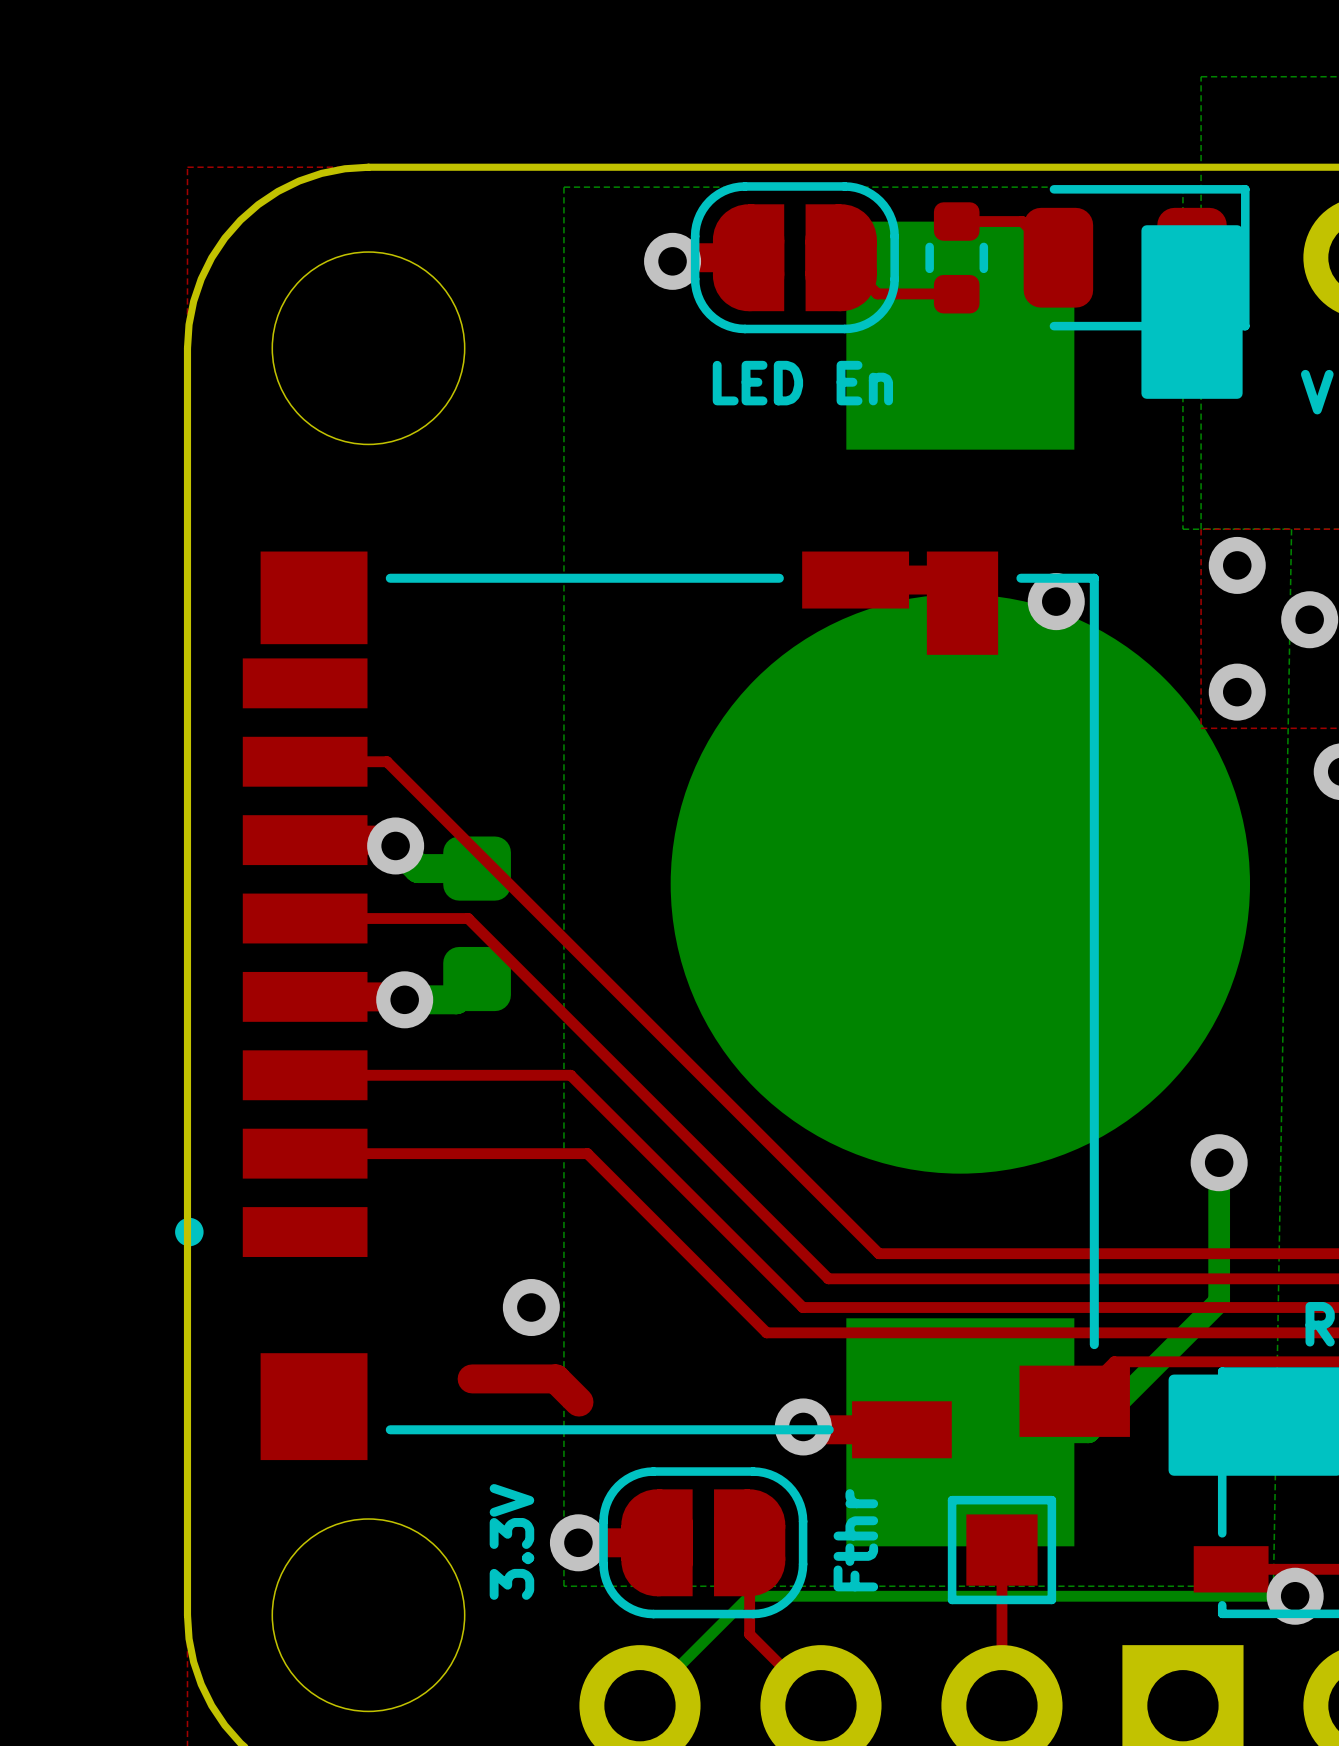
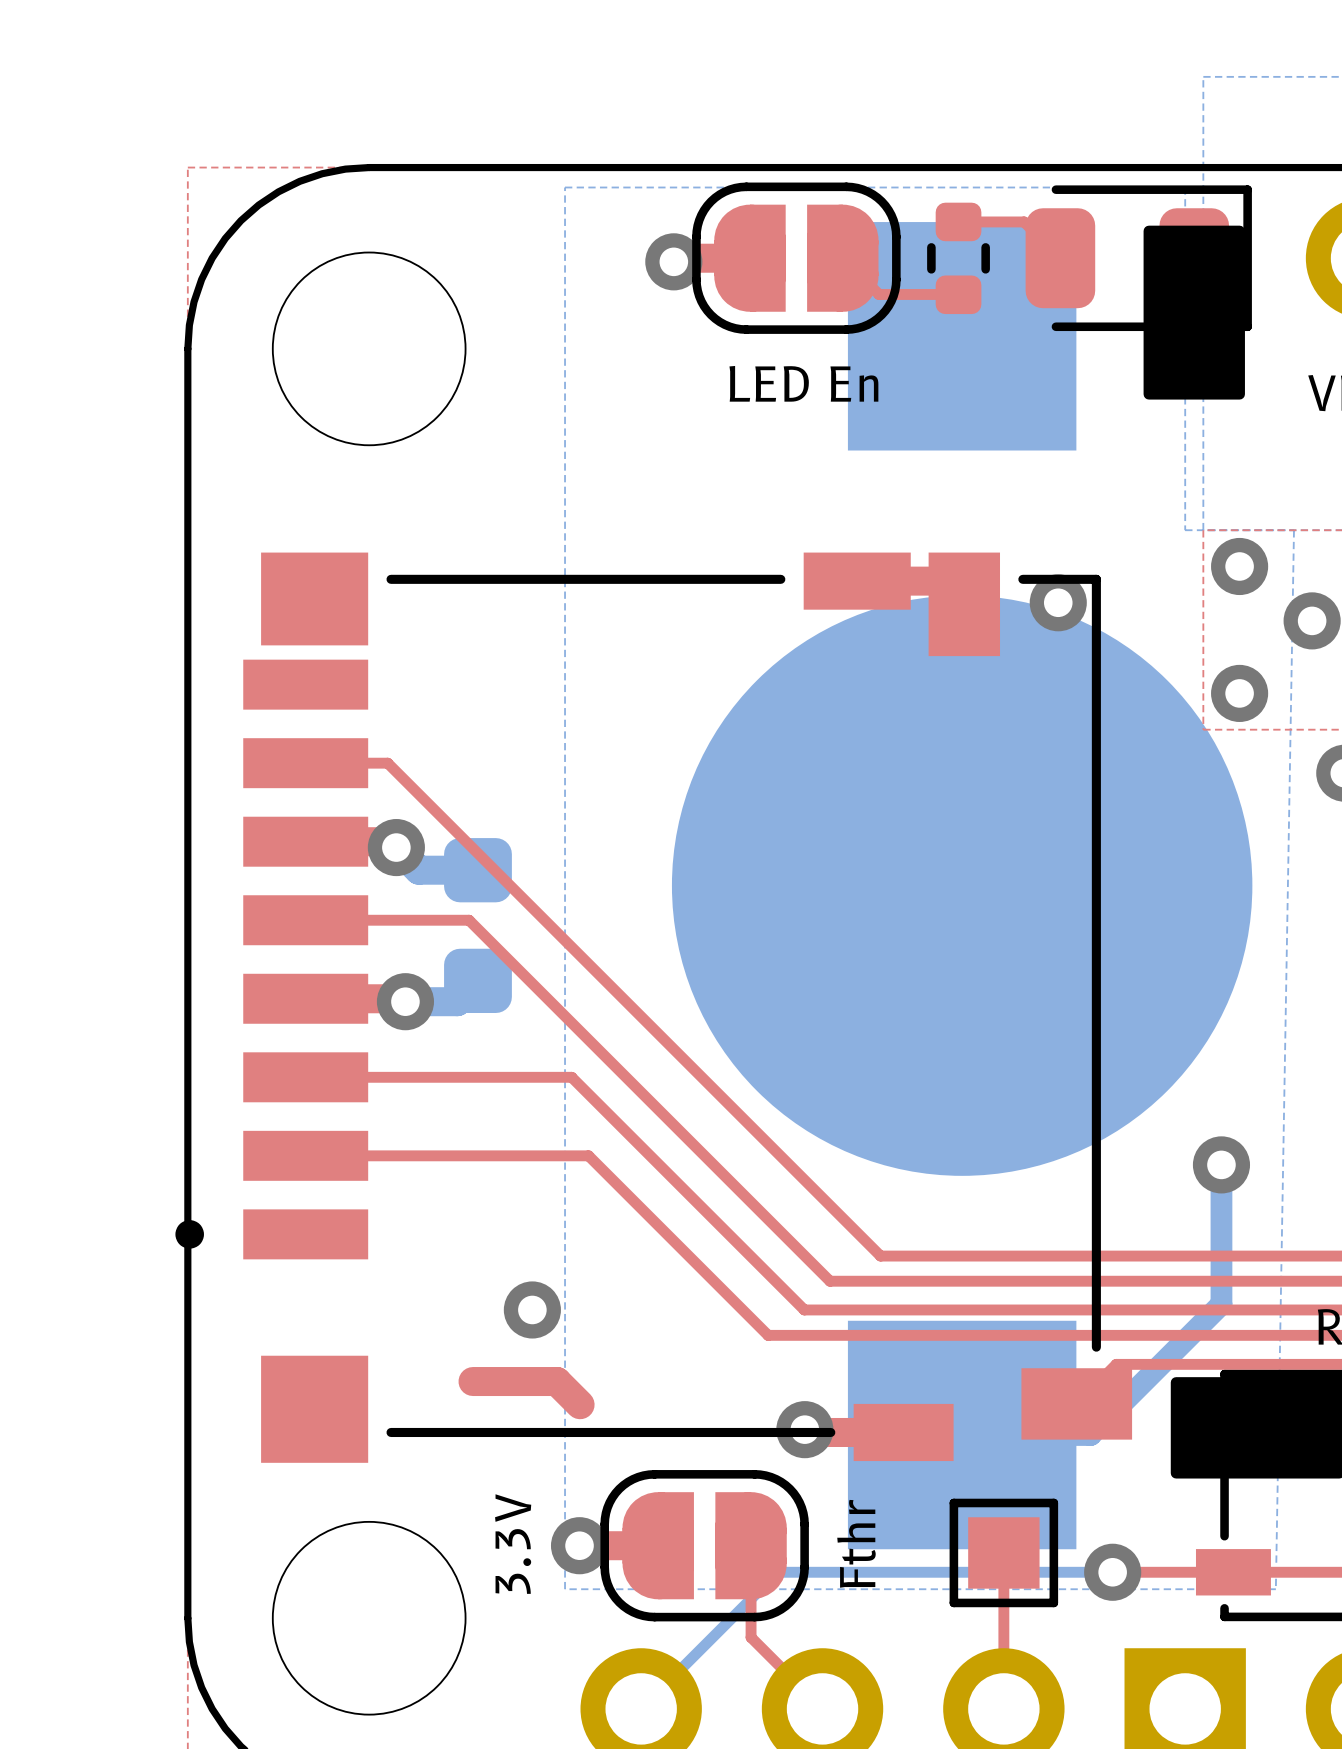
top track: none -> (1112, 1572) (1233, 1572)
bottom track: (749, 1596) (1295, 1596) -> (750, 1599) (777, 1572) (1112, 1572)
via position: (1295, 1596) -> (1112, 1572)

